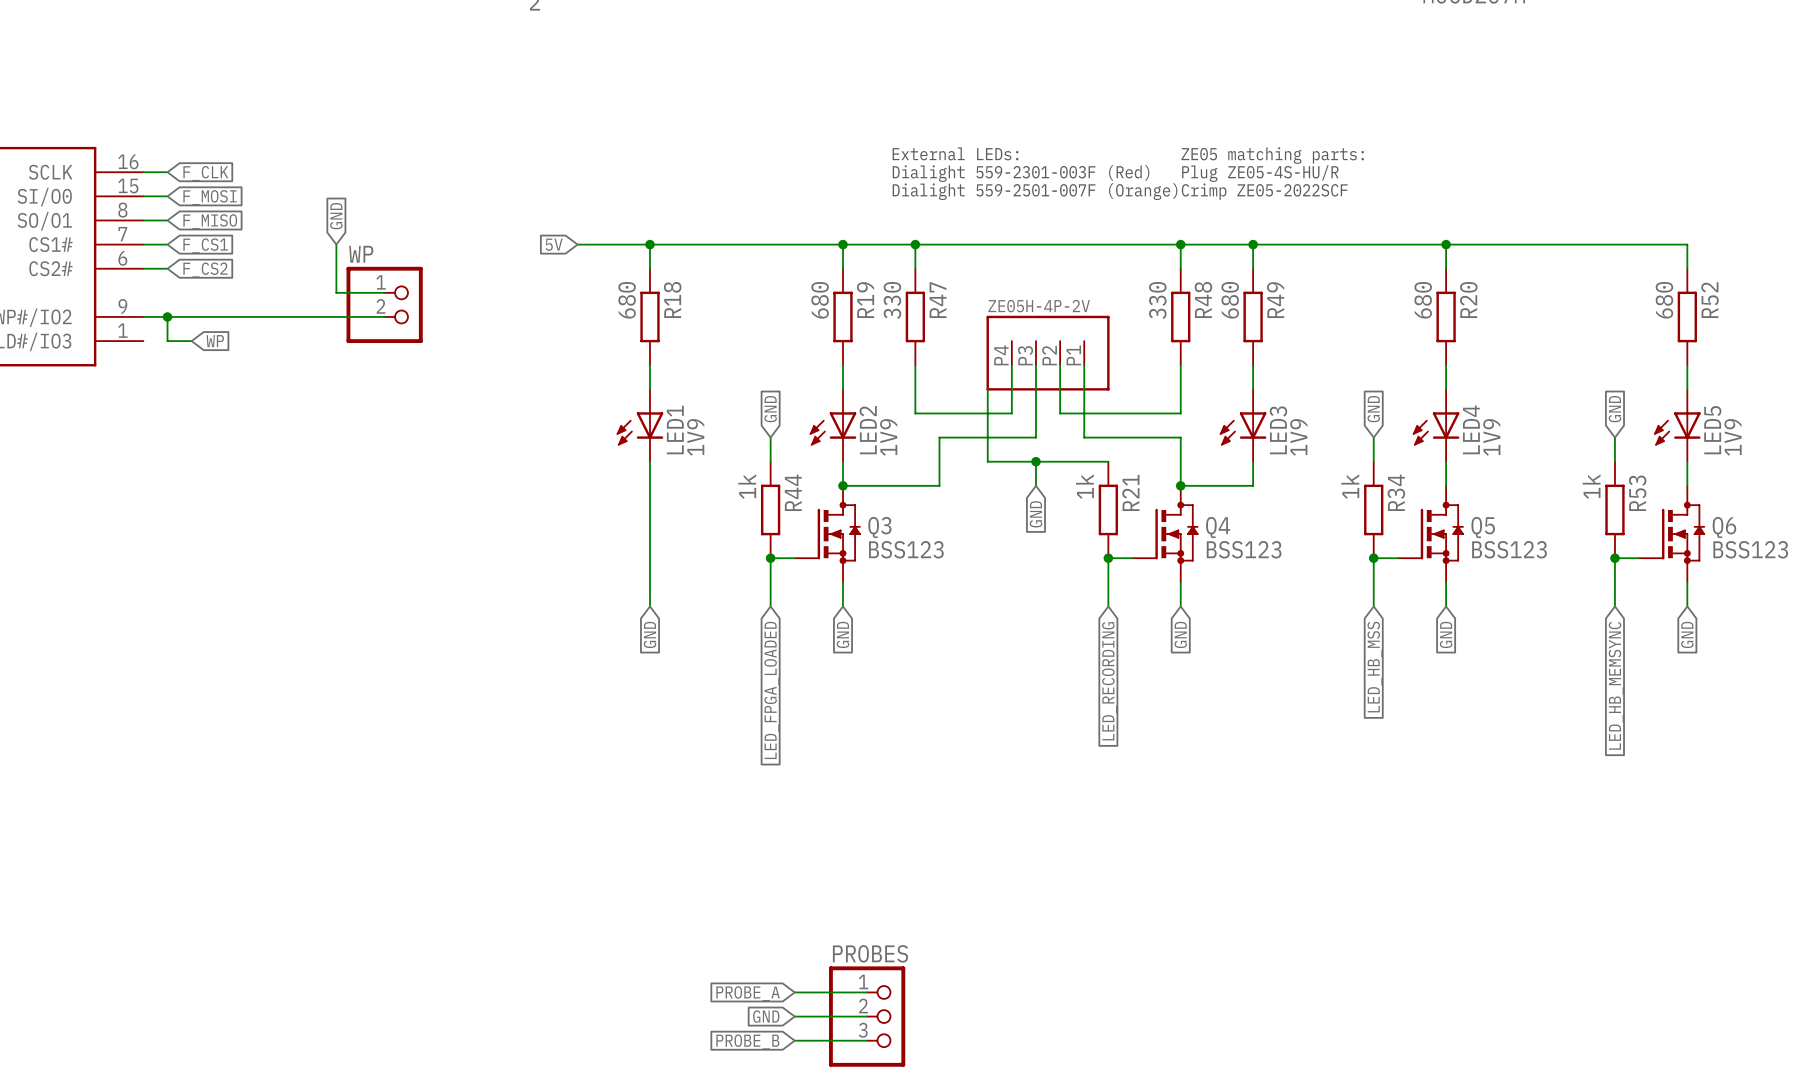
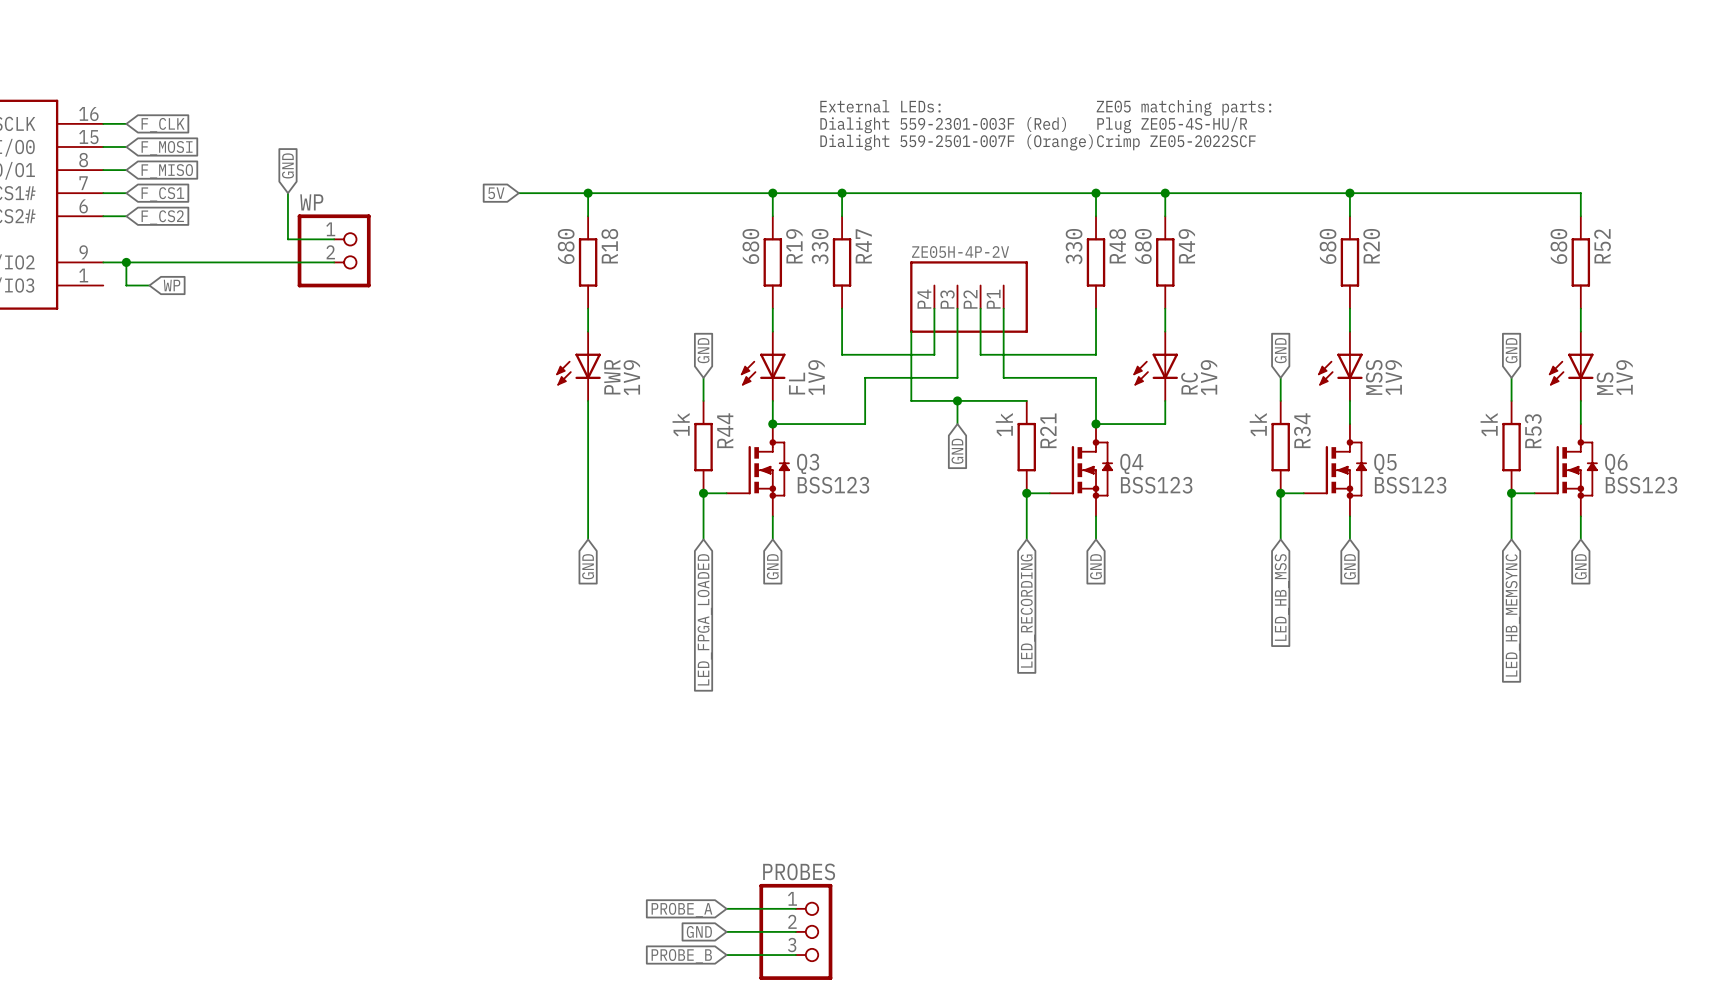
LED1 name: LED1 (675, 429) -> PWR (612, 377)
LED4 name: LED4 (1471, 429) -> MSS (1374, 377)
LED2 name: LED2 (868, 430) -> FL (797, 383)
LED3 name: LED3 (1278, 430) -> RC (1189, 383)
LED5 name: LED5 (1712, 430) -> MS (1605, 383)

